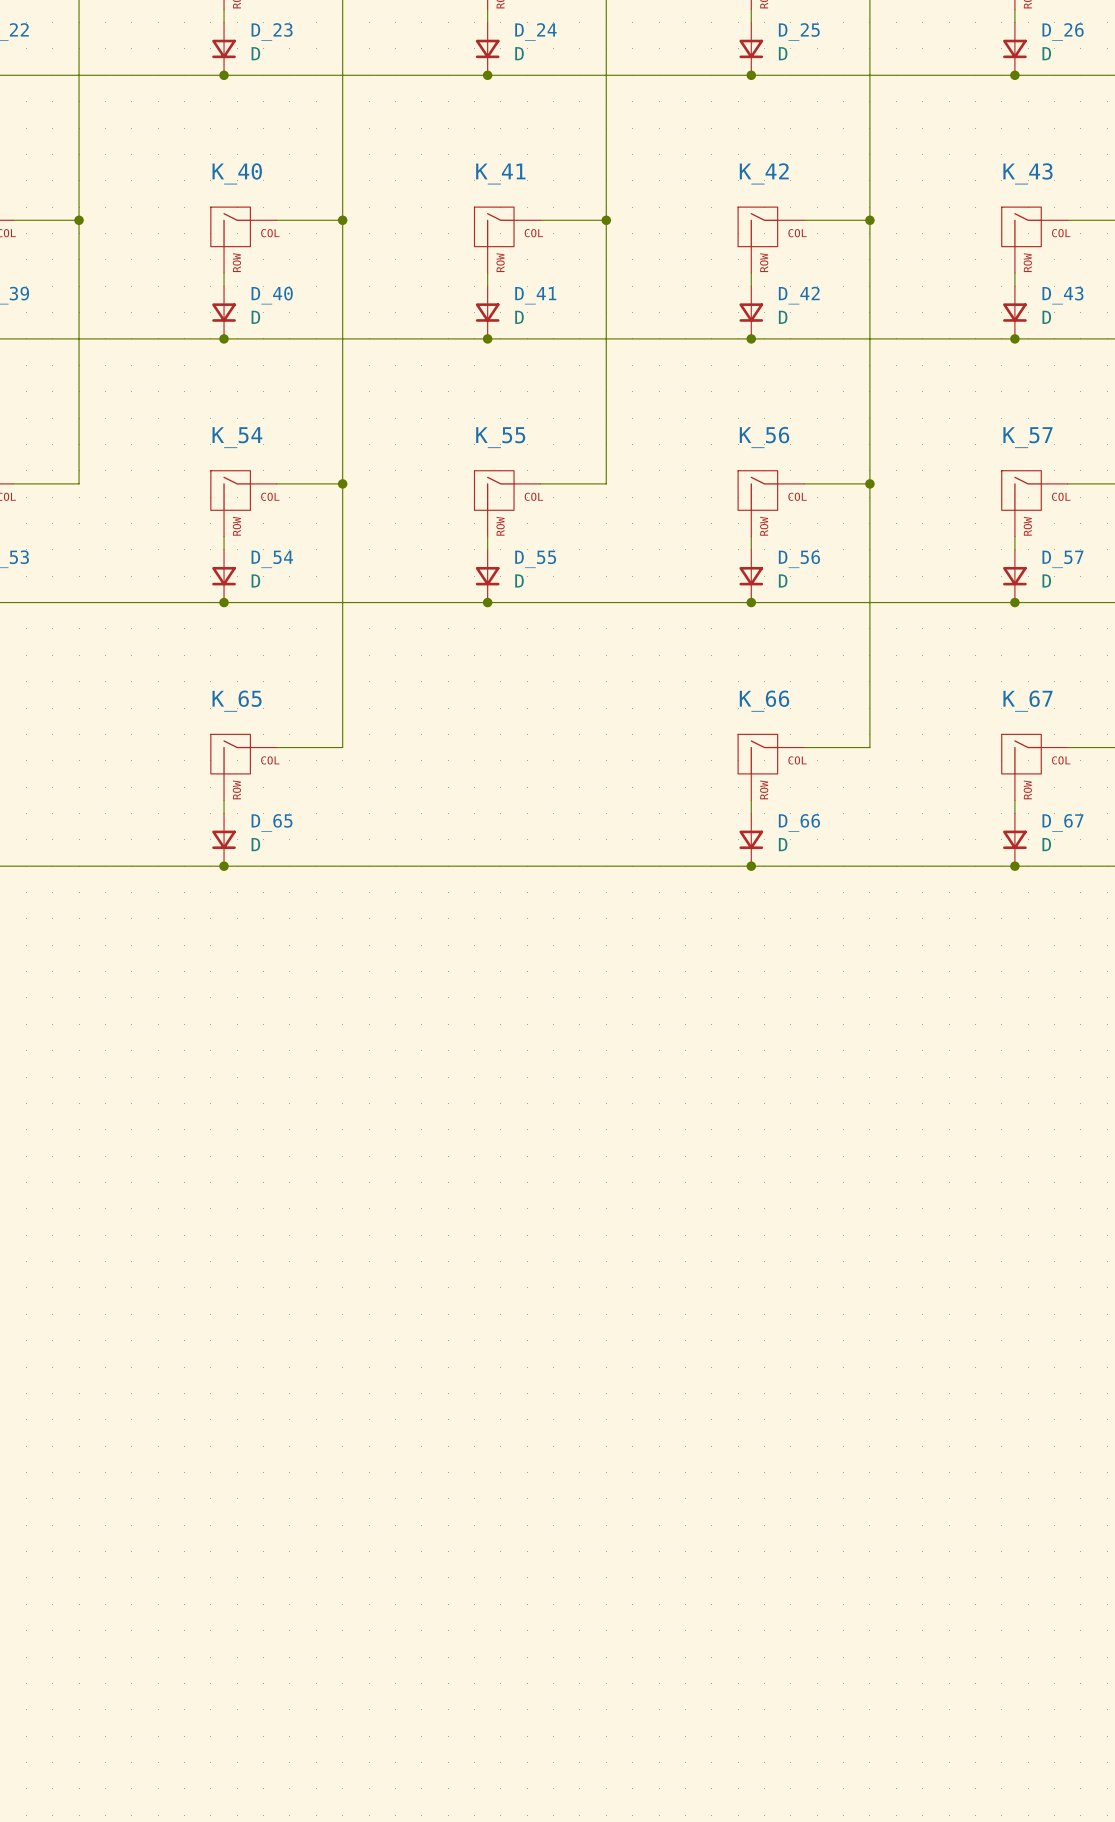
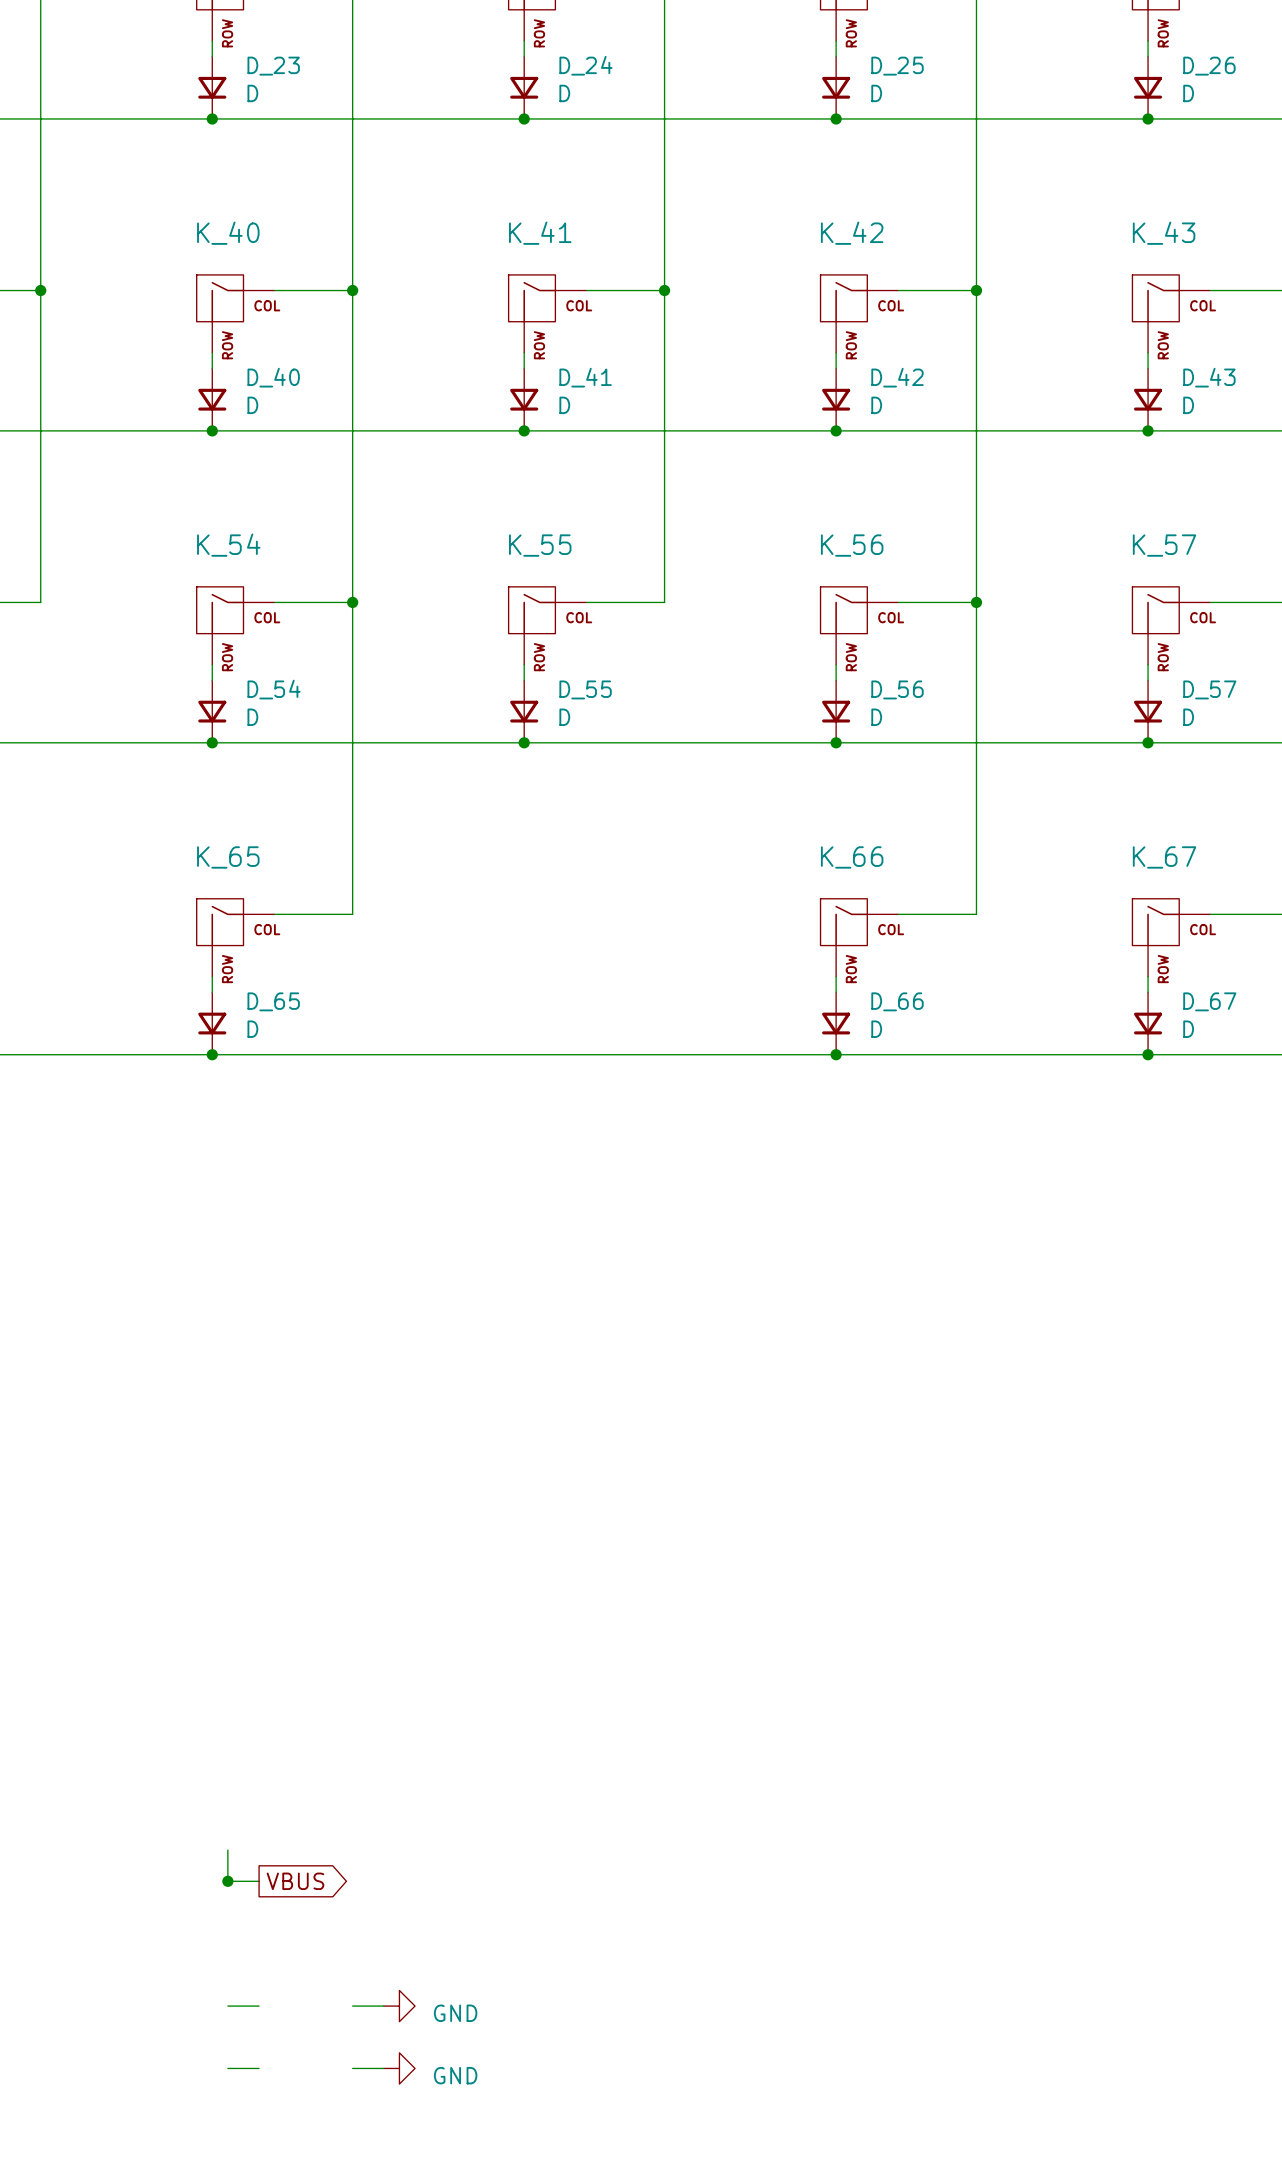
wire: none -> (227, 1850) (227, 1881) (259, 1881)
junction: none -> (227, 1881)
global label: none -> VBUS (295, 1881)
wire: none -> (227, 2006) (259, 2006)
wire: none -> (352, 2006) (383, 2006)
power symbol: none -> GND (399, 2006)
wire: none -> (227, 2068) (259, 2068)
wire: none -> (352, 2068) (383, 2068)
power symbol: none -> GND (399, 2068)

